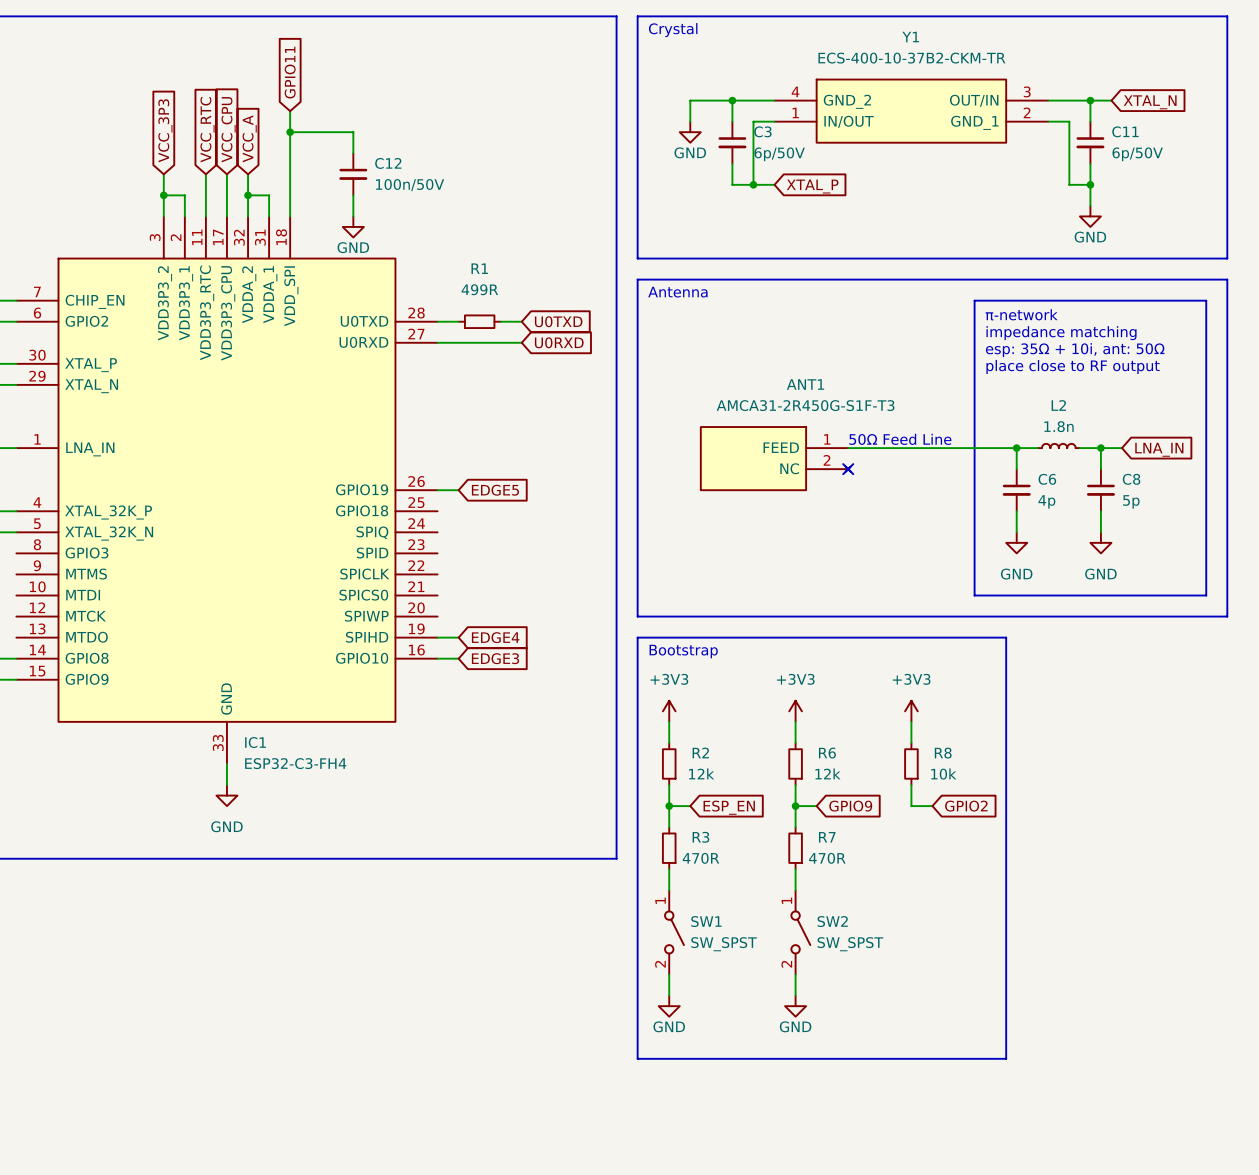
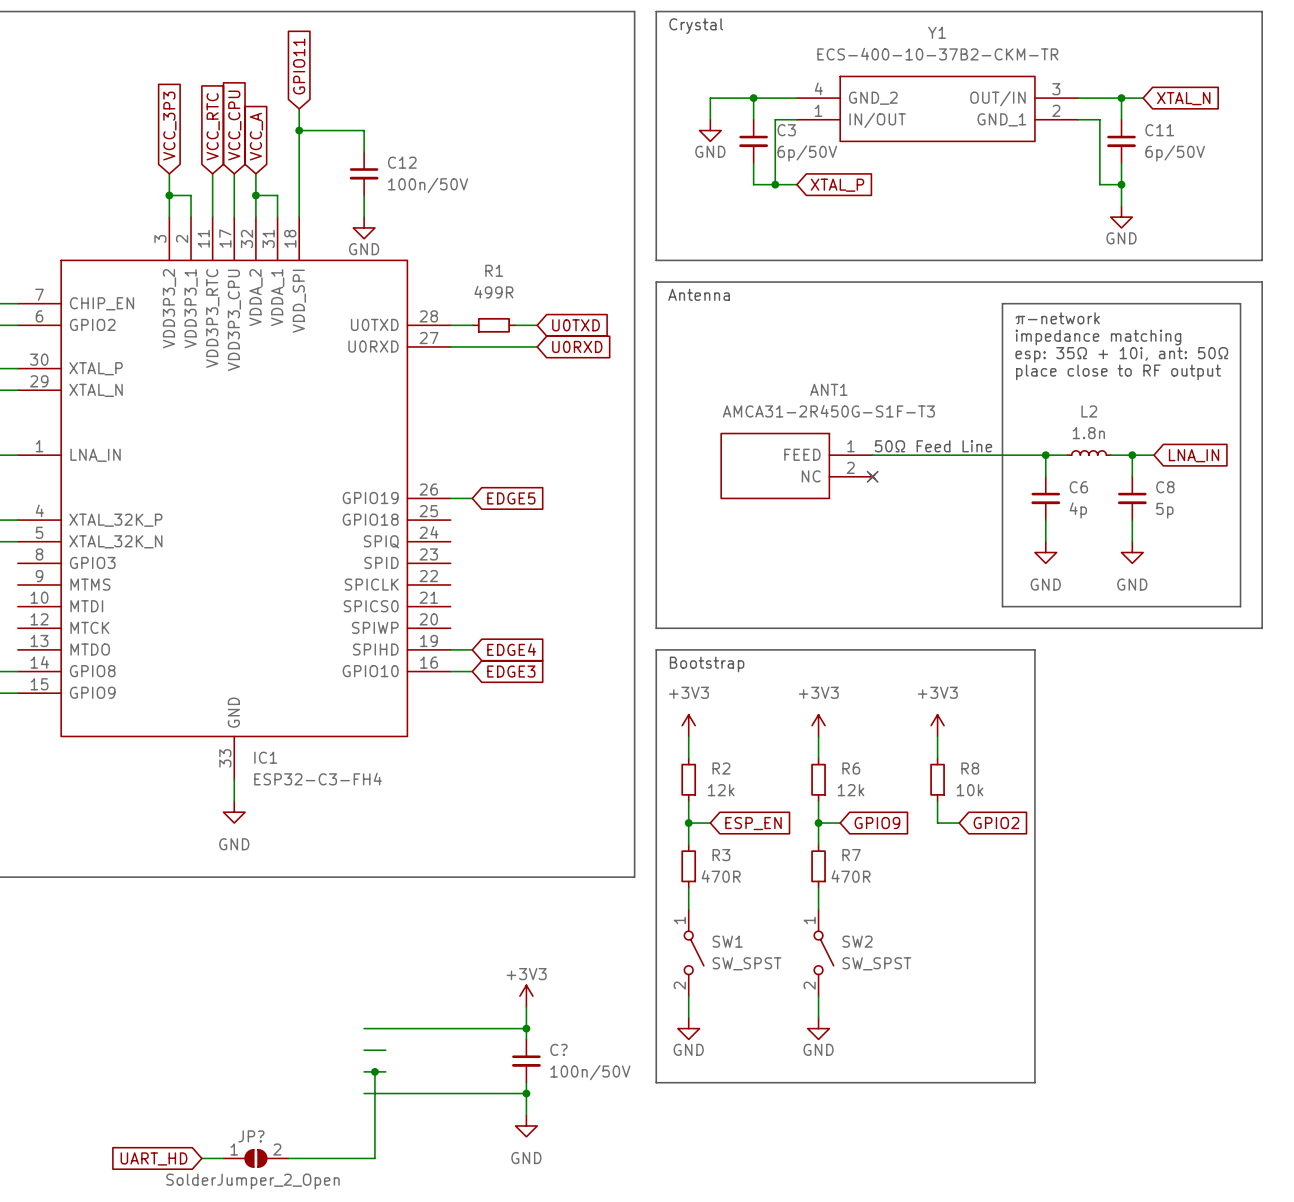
power symbol: none -> +3V3 (526, 996)
wire: none -> (526, 1006) (526, 1039)
wire: none -> (364, 1028) (526, 1028)
junction: none -> (526, 1028)
wire: none -> (364, 1050) (385, 1050)
C?: none -> 100n/50V (526, 1061)
wire: none -> (364, 1071) (385, 1071)
wire: none -> (374, 1071) (374, 1158) (288, 1158)
junction: none -> (374, 1071)
wire: none -> (526, 1082) (526, 1115)
wire: none -> (364, 1093) (526, 1093)
junction: none -> (526, 1093)
power symbol: none -> GND (526, 1125)
wire: none -> (201, 1158) (223, 1158)
JP?: none -> SolderJumper_2_Open (255, 1158)
global label: none -> UART_HD (154, 1158)

